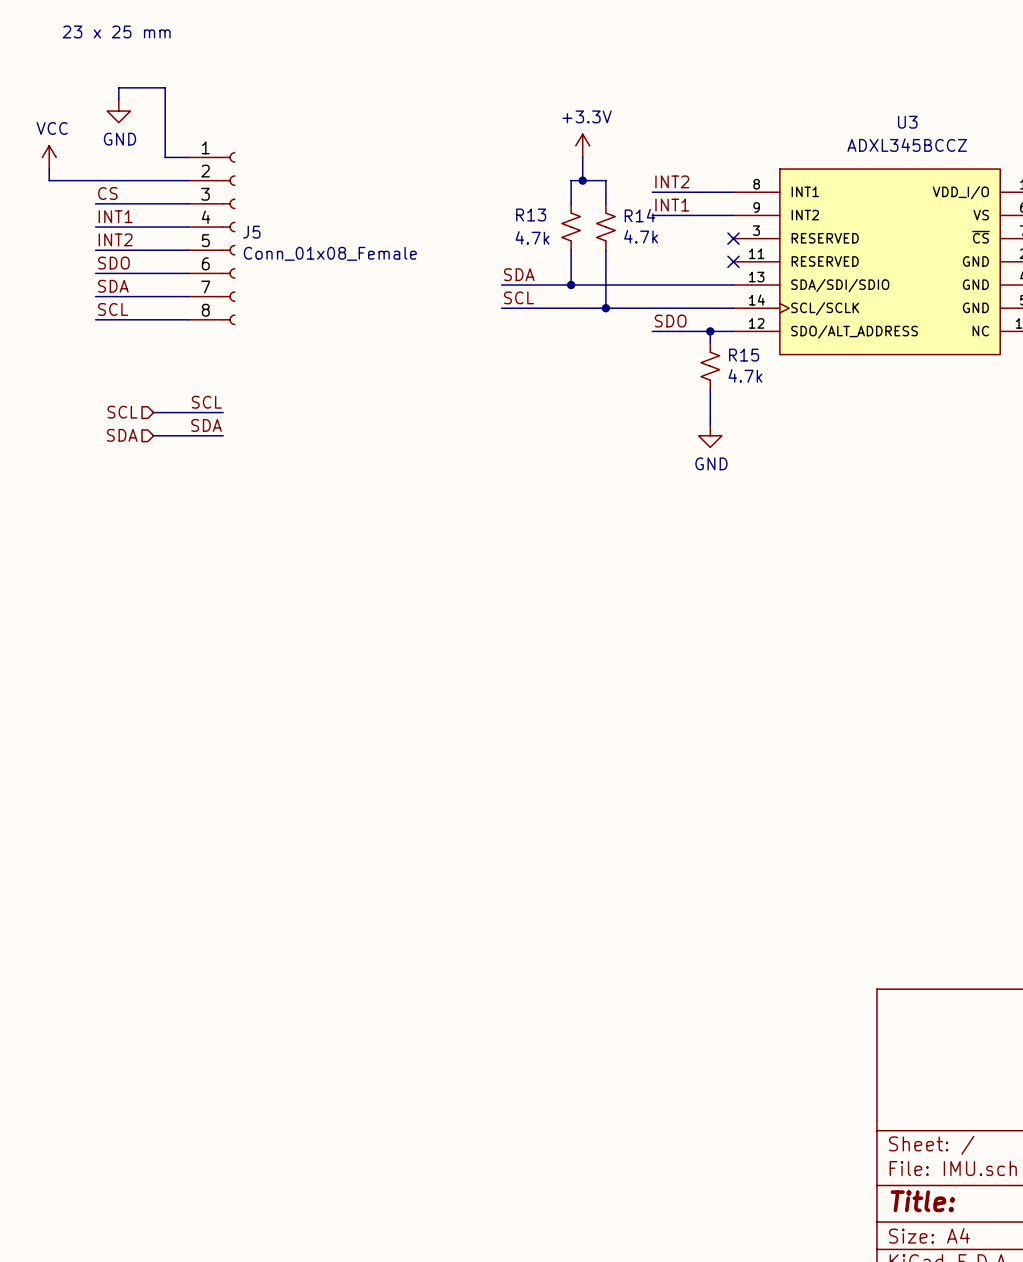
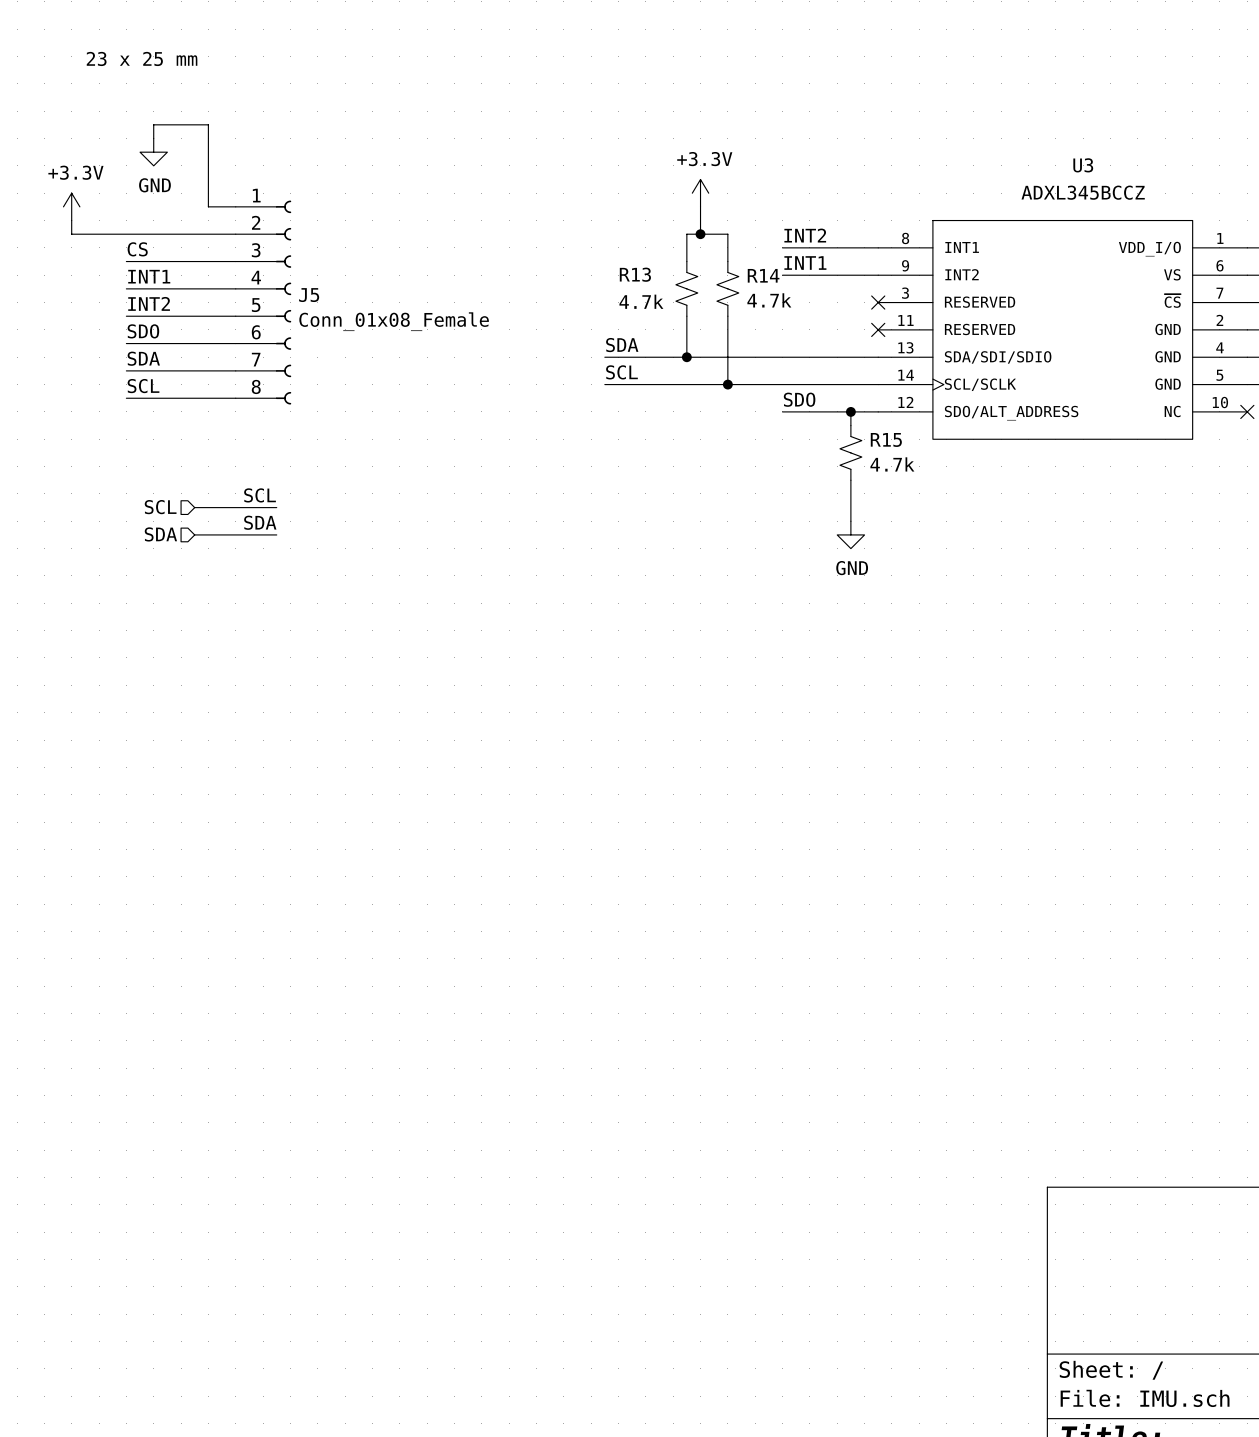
power symbol: VCC (49, 157) -> +3.3V (71, 206)

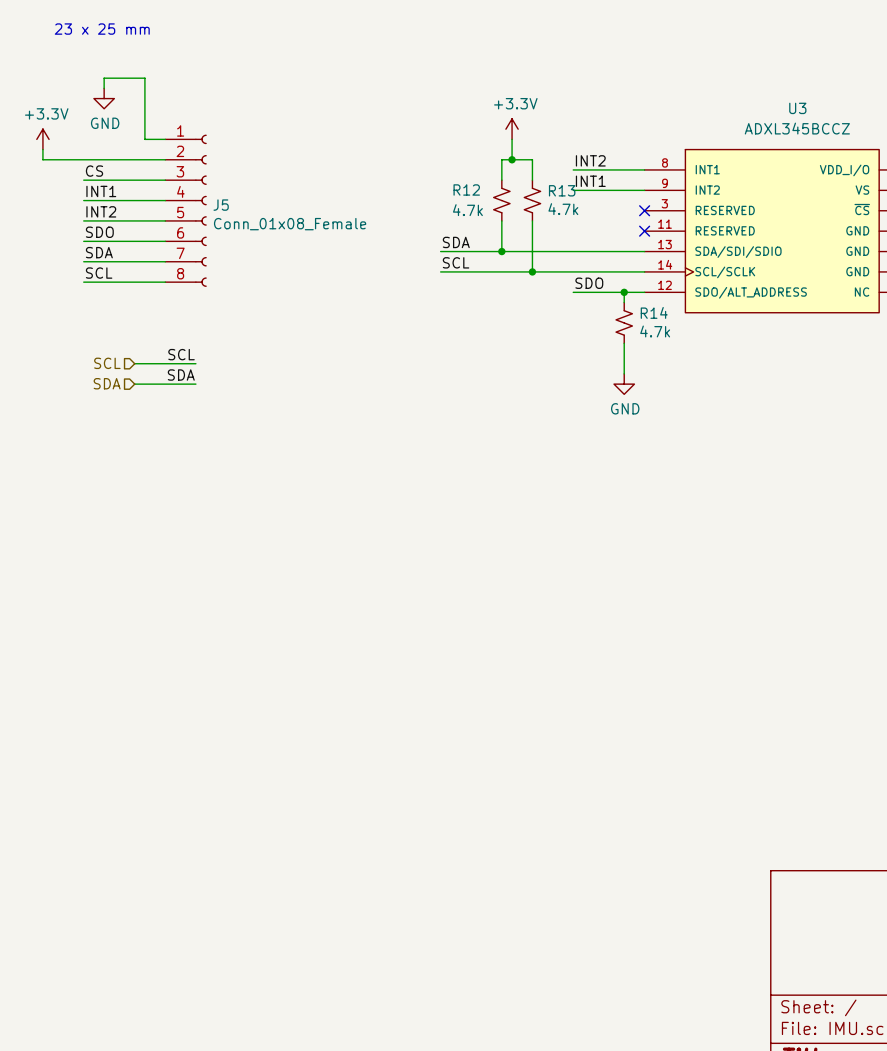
R13 name: R13 (635, 274) -> R12 (466, 189)
R14 name: R14 (763, 275) -> R13 (562, 190)
R15 name: R15 (886, 439) -> R14 (654, 312)

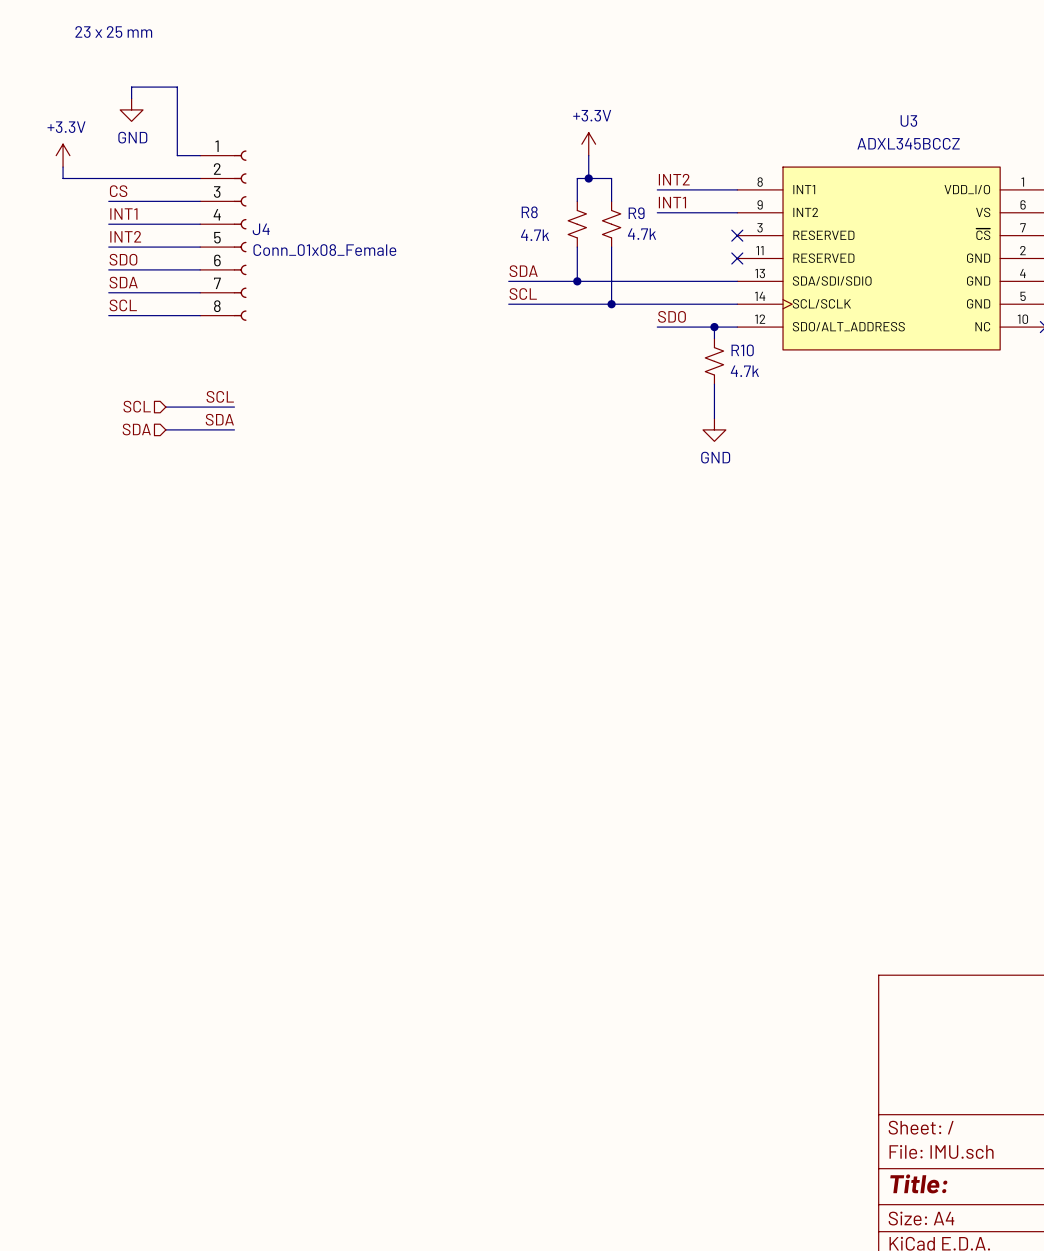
R12 name: R12 (466, 189) -> R8 (529, 212)
R13 name: R13 (562, 190) -> R9 (636, 213)
J5 name: J5 (221, 205) -> J4 (261, 229)
R14 name: R14 (654, 312) -> R10 (742, 350)

